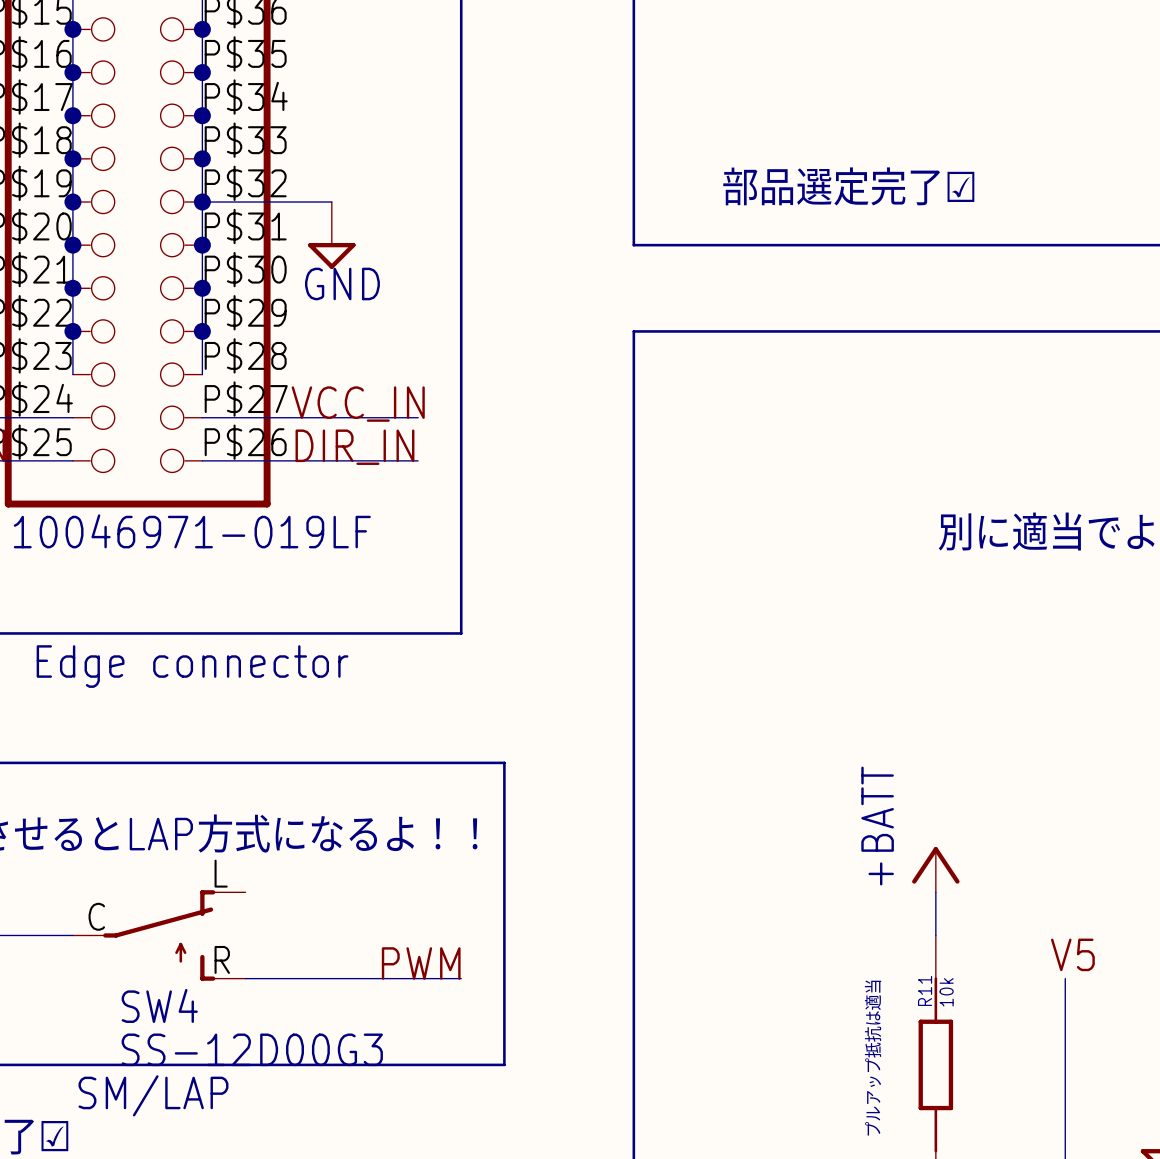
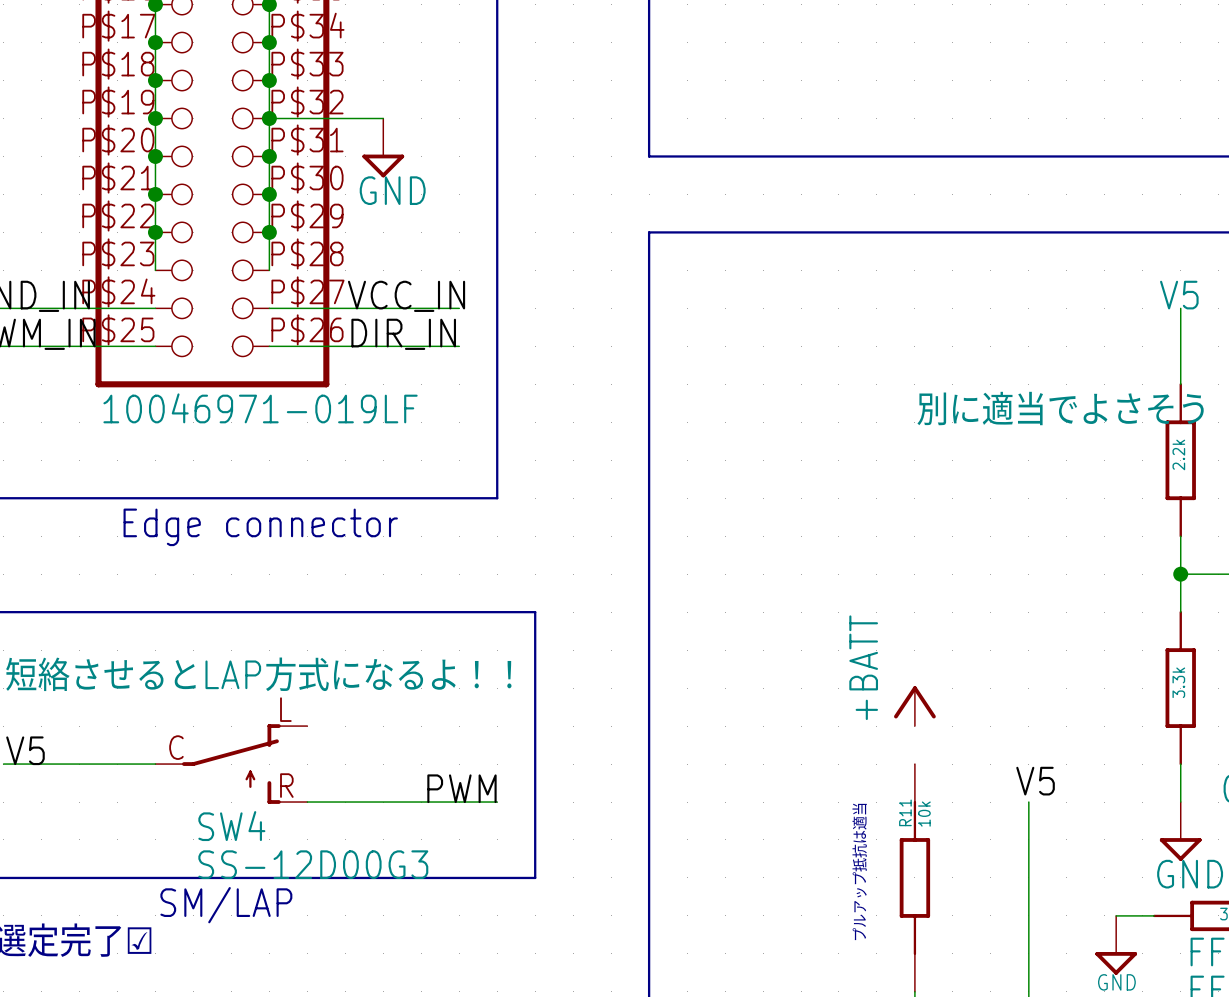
text: 部品選定完了☑ (848, 186) -> none
wire: (935, 892) (935, 935) -> none

